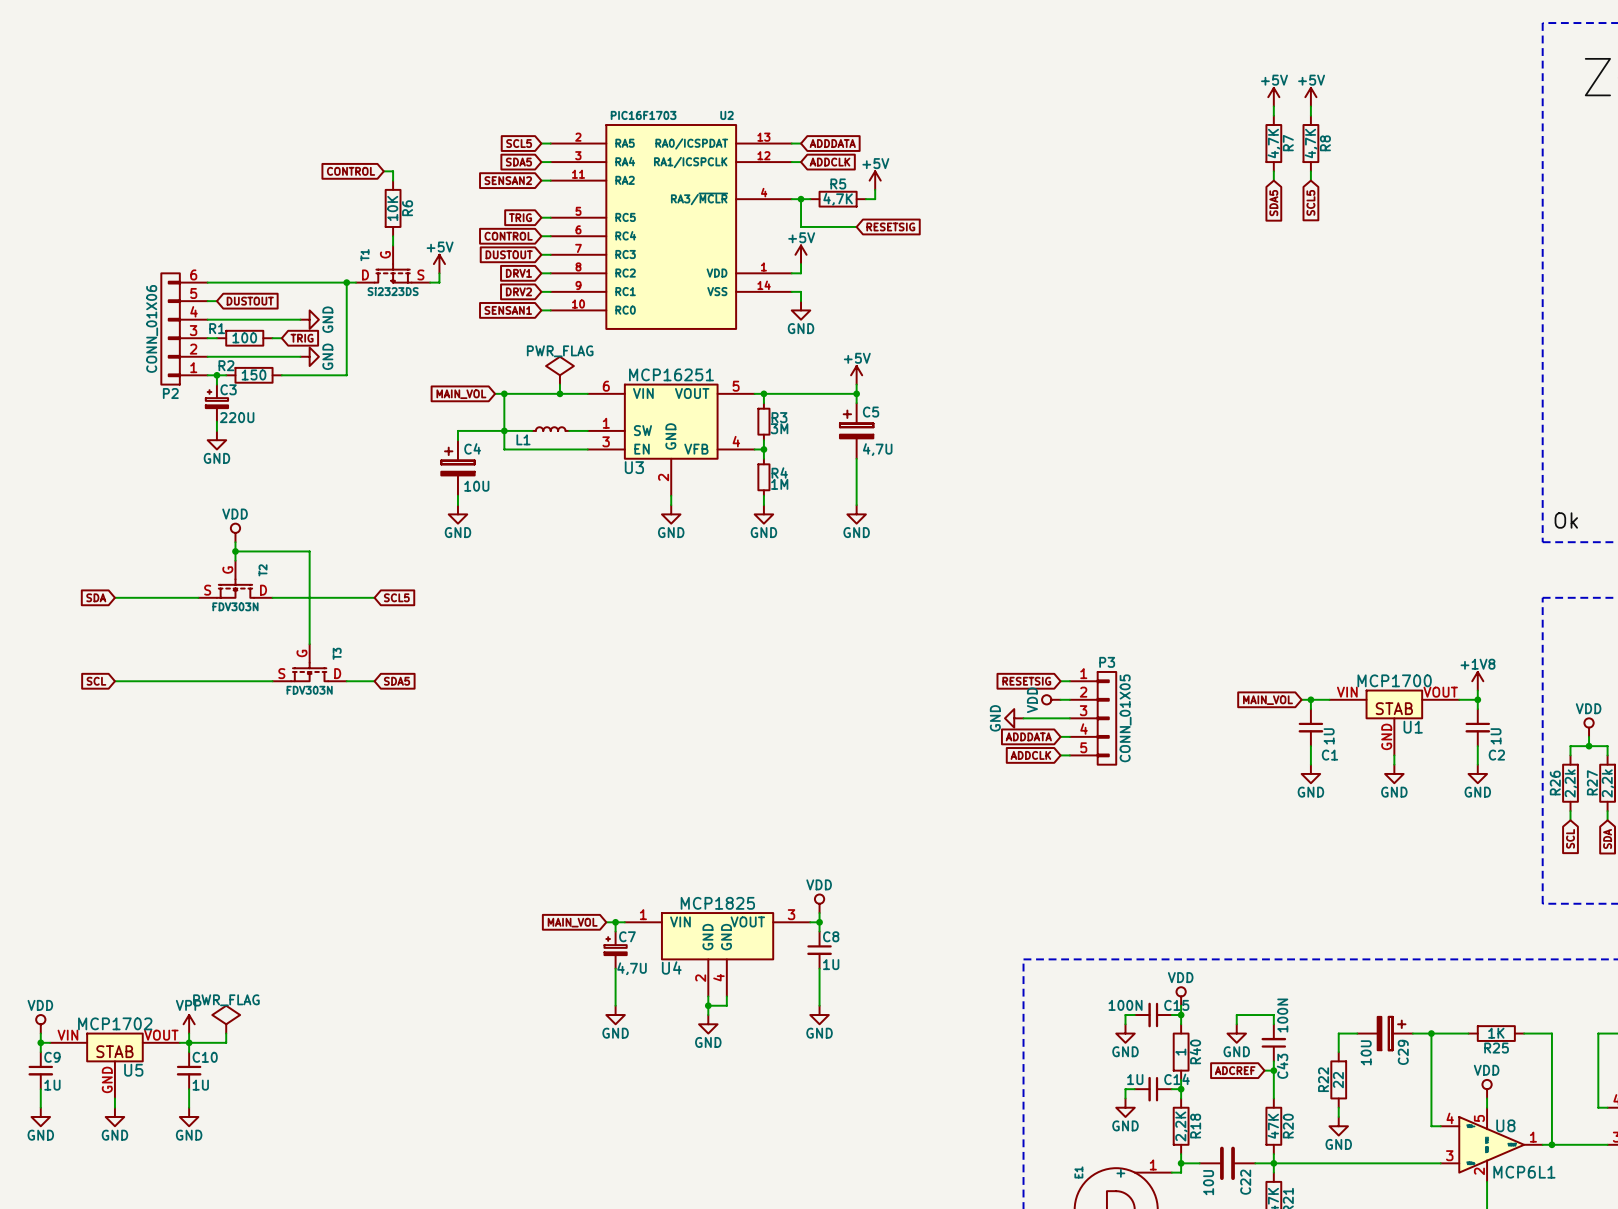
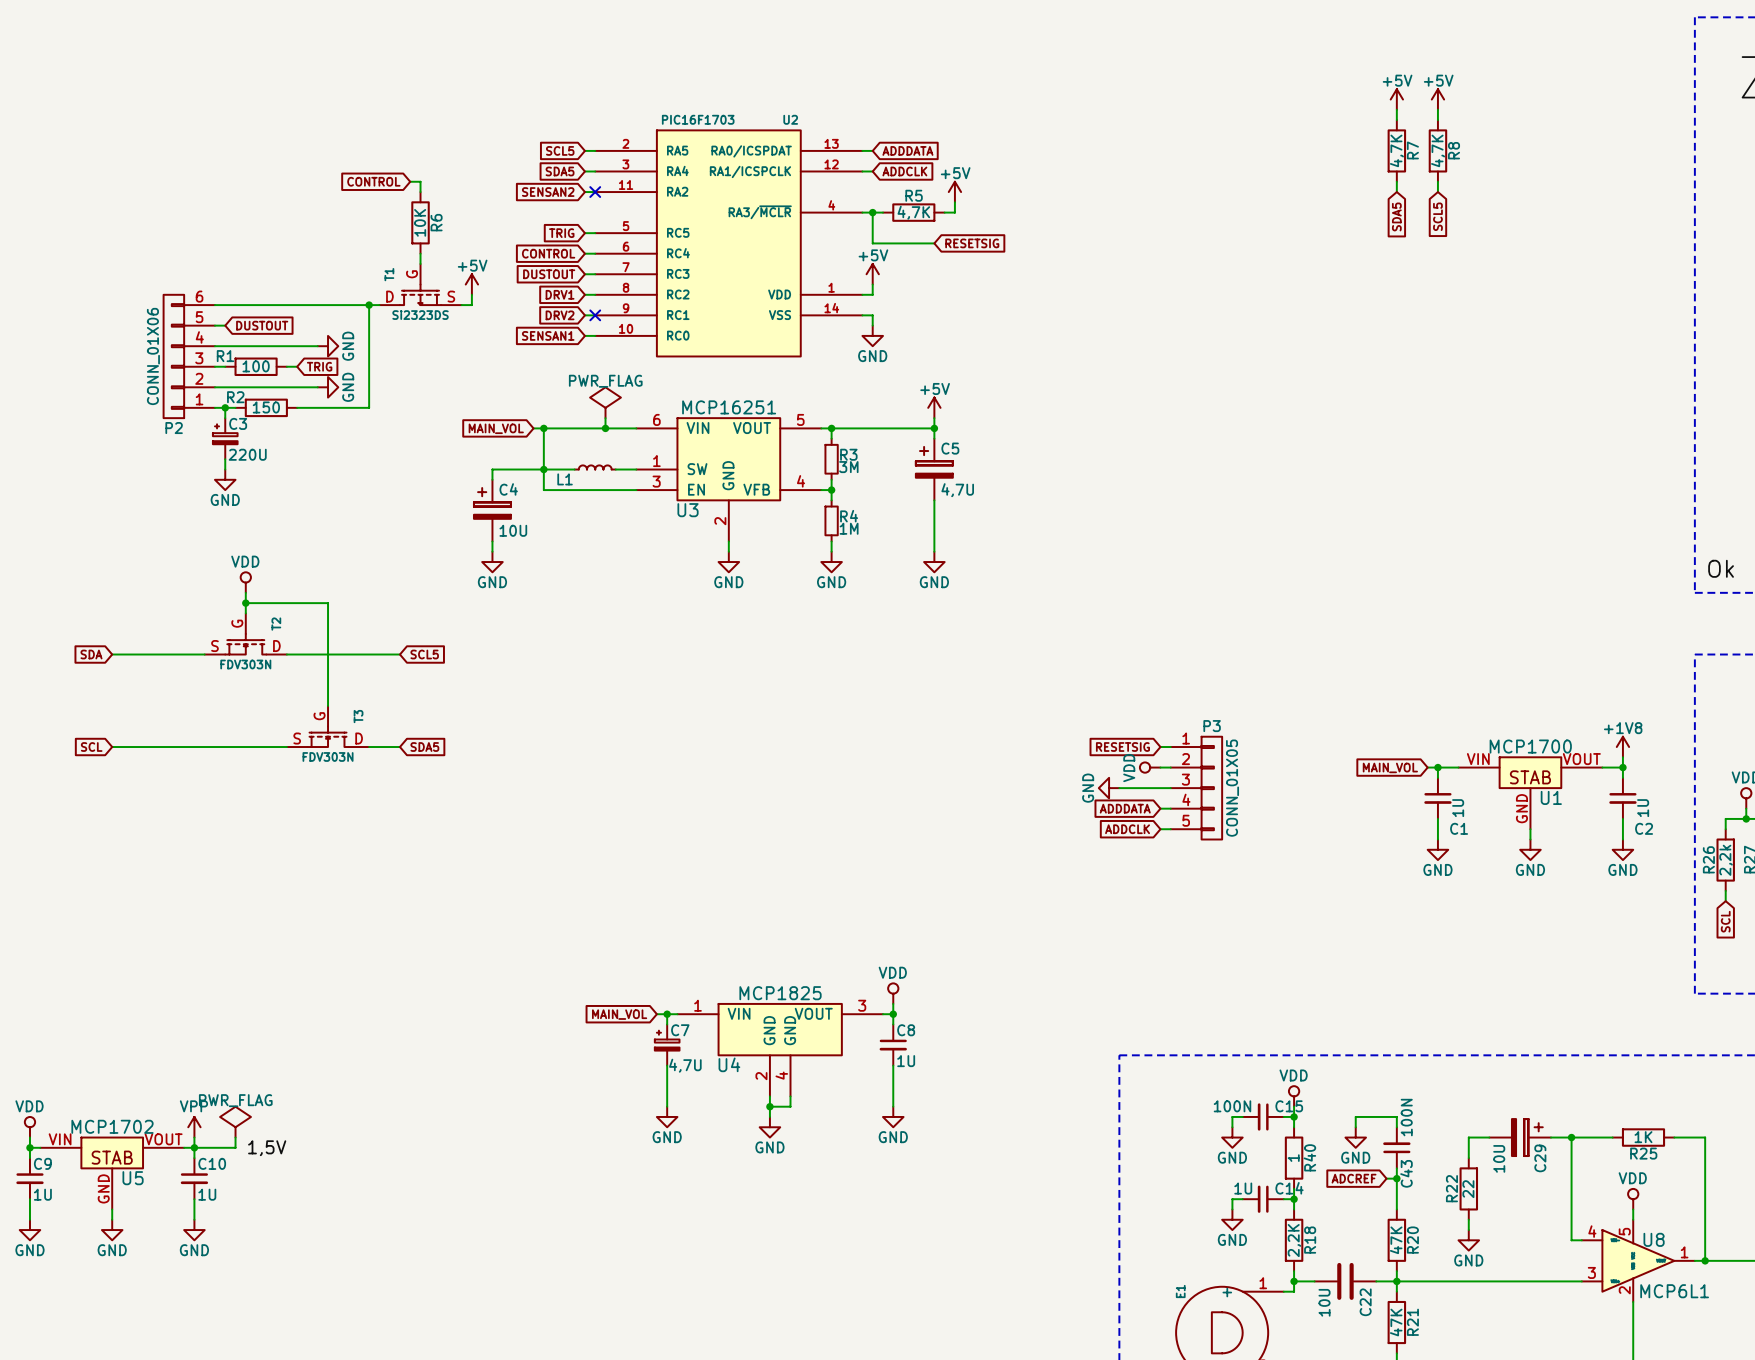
no-connect mark: none -> (595, 192)
no-connect mark: none -> (595, 315)
label: none -> 1,5V (267, 1148)

